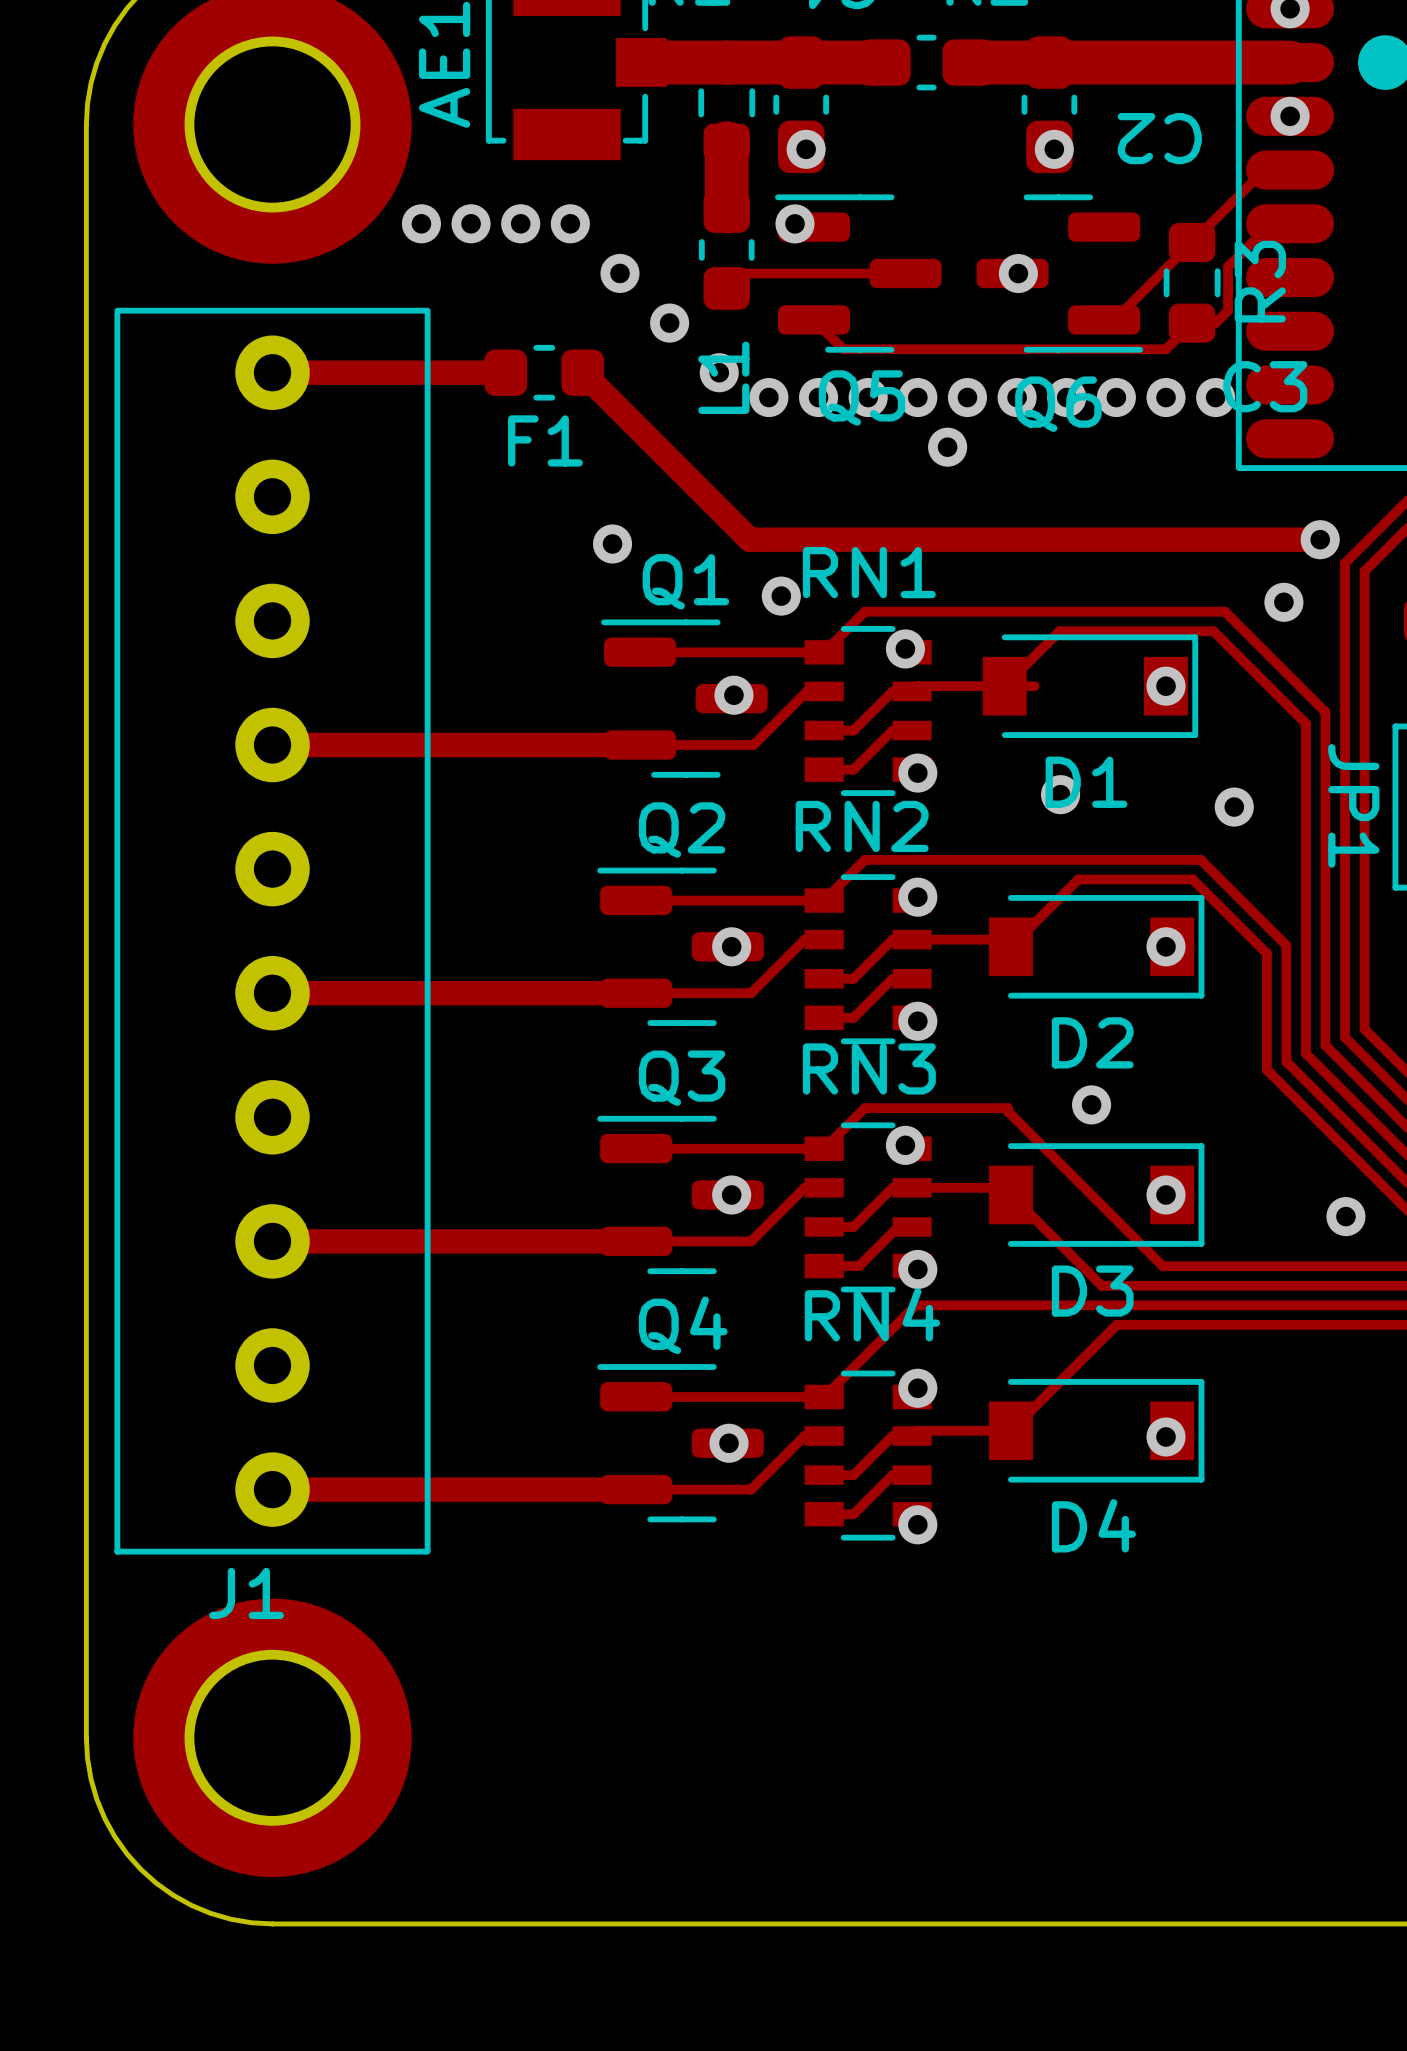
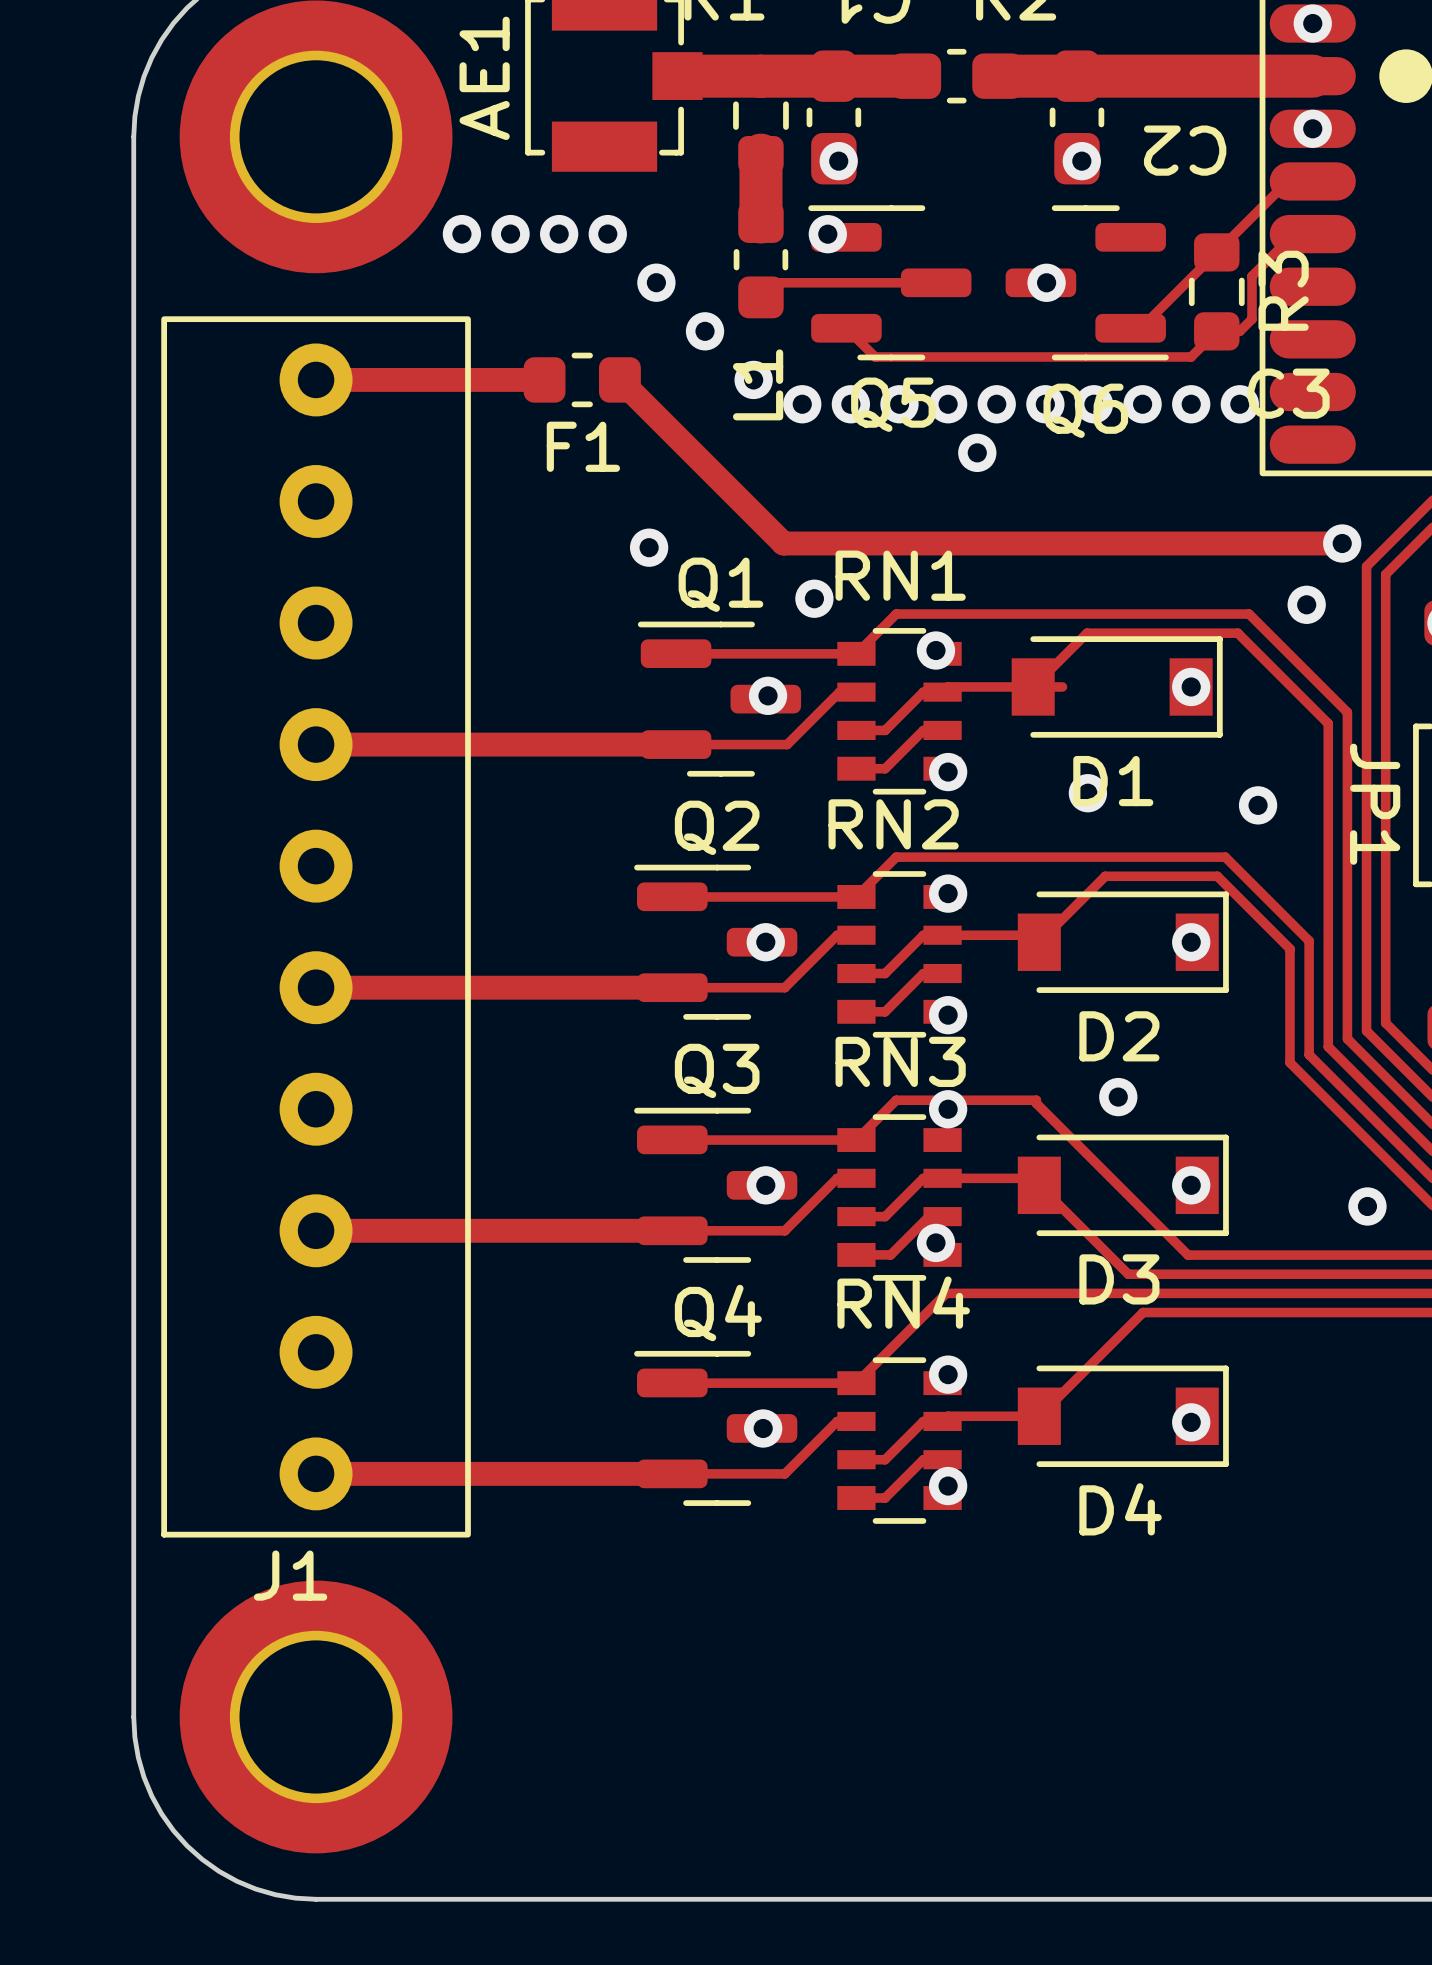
via position: (905, 1145) -> (948, 1109)
via position: (917, 1269) -> (935, 1242)
via position: (917, 1524) -> (948, 1486)

